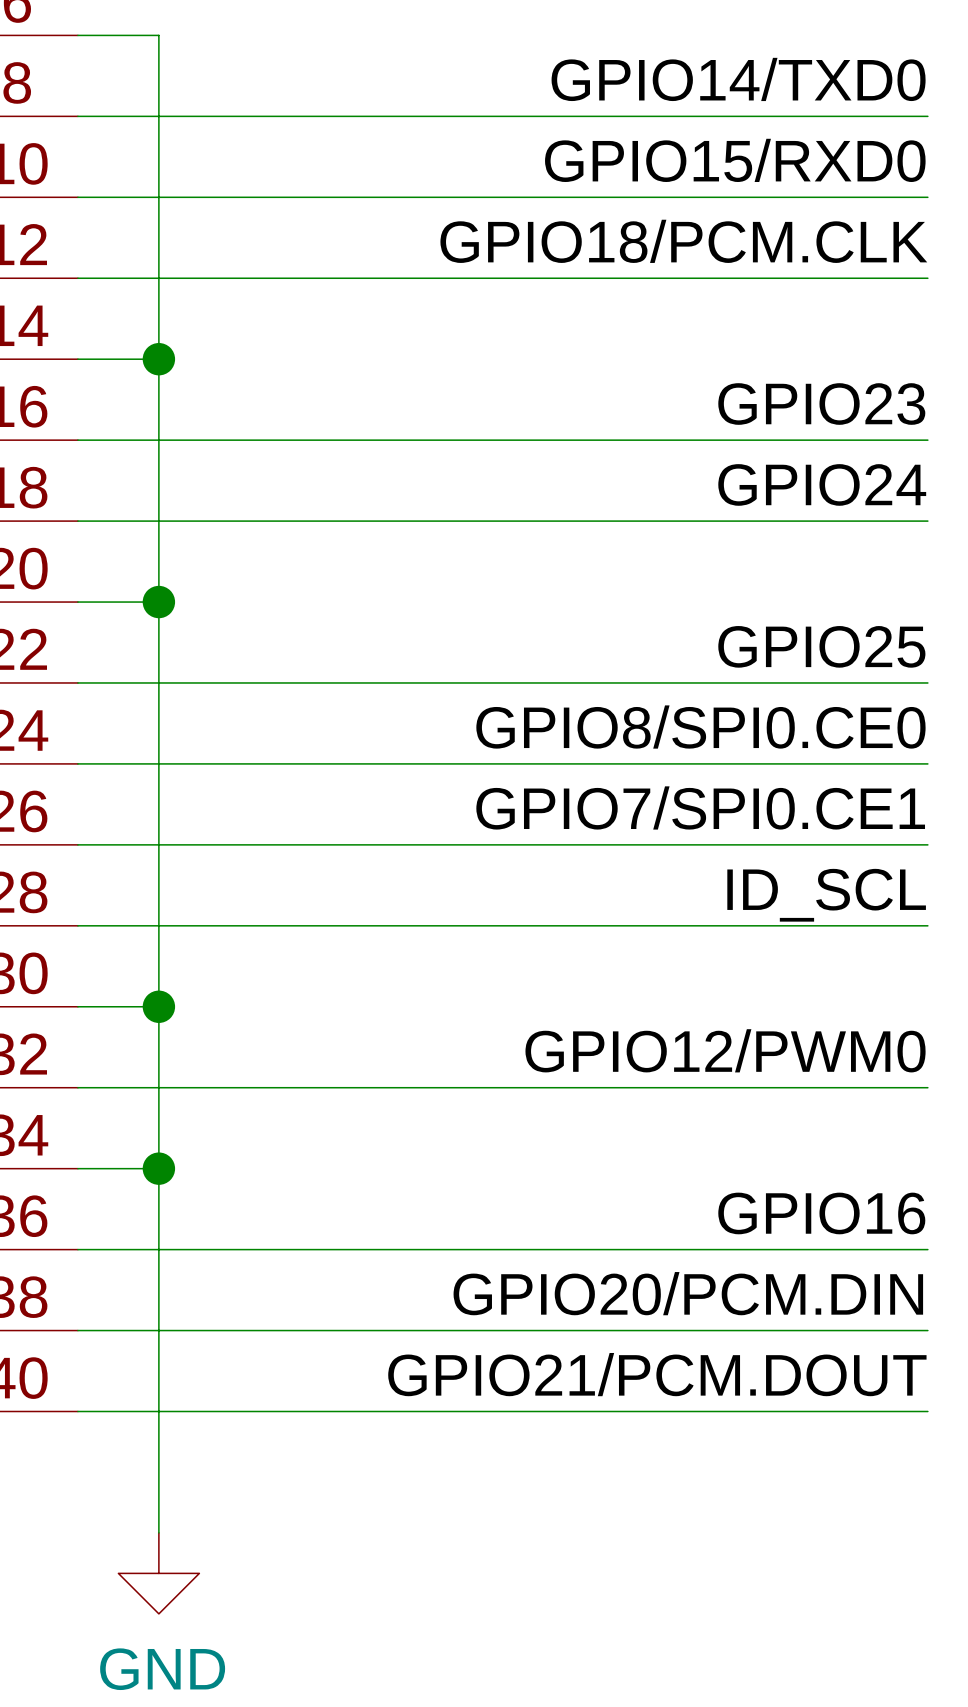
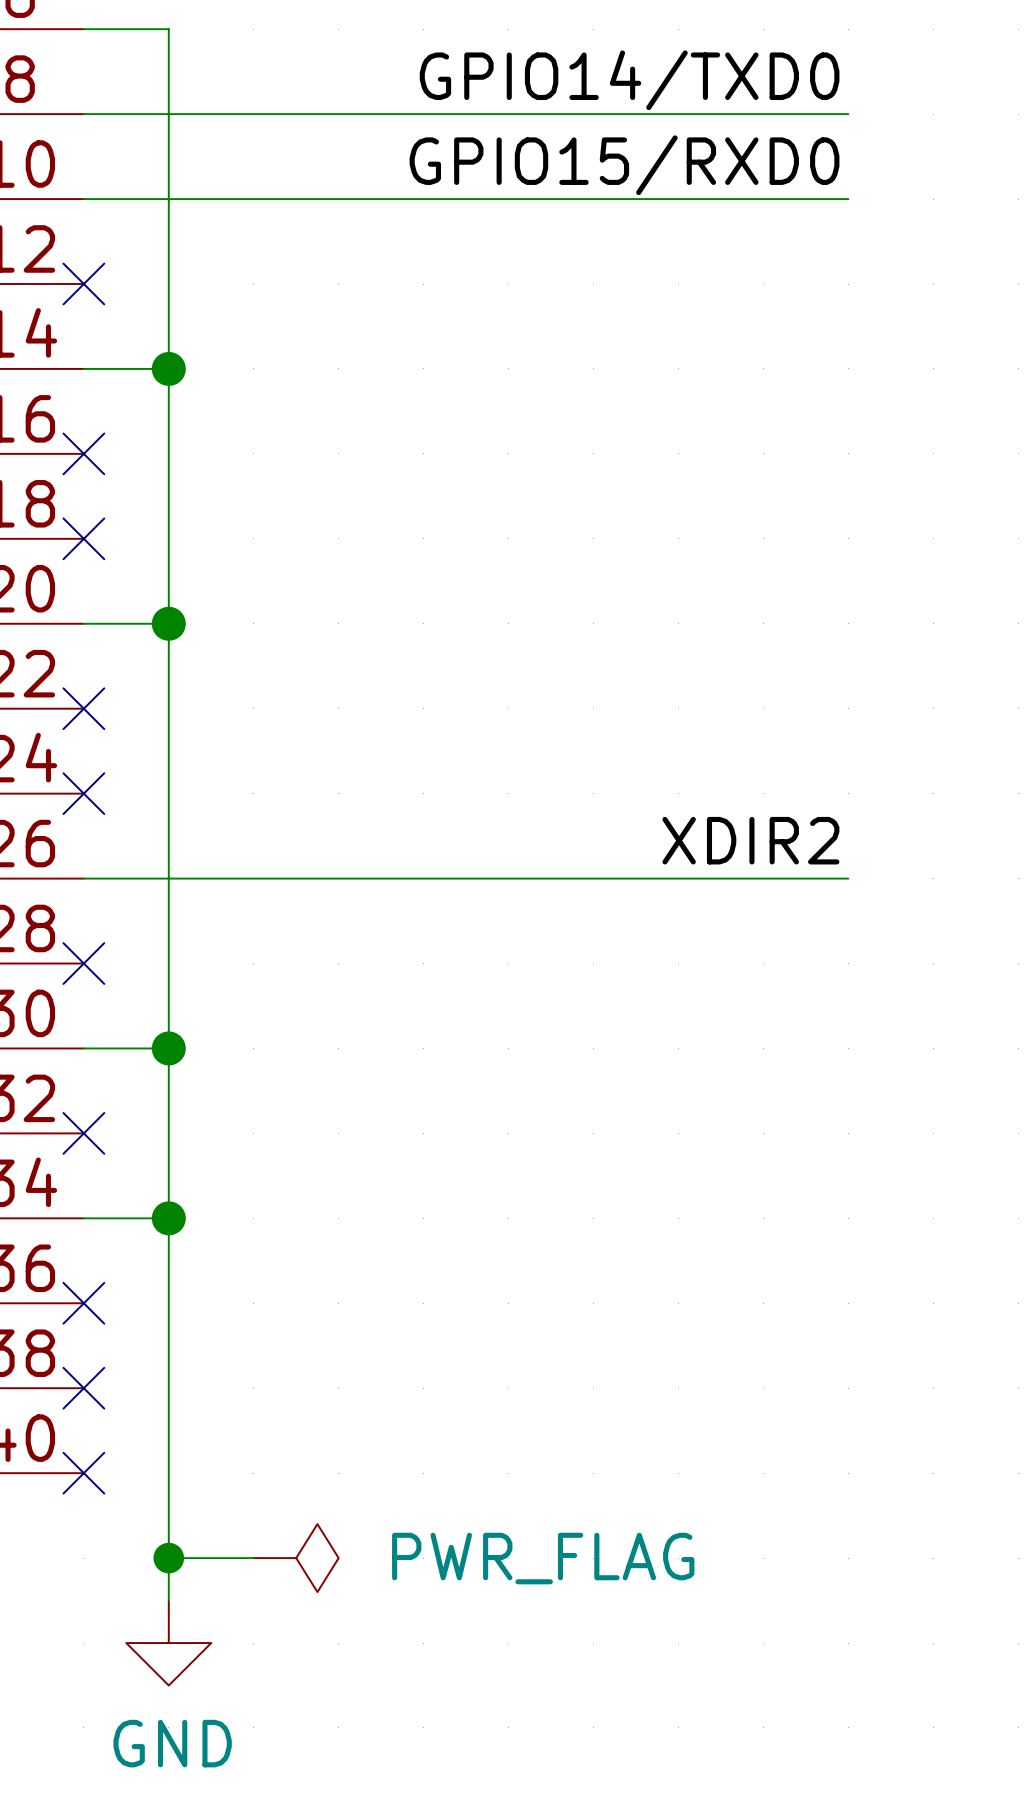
label position: GPIO14/TXD0 (738, 79) -> GPIO14/TXD0 (629, 80)
wire: (806, 116) (927, 116) -> none
label position: GPIO15/RXD0 (735, 160) -> GPIO15/RXD0 (624, 165)
wire: (806, 197) (927, 197) -> none
label: GPIO18/PCM.CLK (683, 241) -> none
wire: (77, 278) (927, 278) -> none
no-connect mark: none -> (83, 284)
label: GPIO23 (821, 404) -> none
wire: (77, 440) (927, 440) -> none
no-connect mark: none -> (83, 453)
label: GPIO24 (822, 484) -> none
wire: (77, 521) (927, 521) -> none
no-connect mark: none -> (83, 538)
label: GPIO25 (821, 646) -> none
wire: (77, 682) (927, 682) -> none
no-connect mark: none -> (83, 708)
label: GPIO8/SPI0.CE0 (700, 727) -> none
wire: (77, 763) (927, 763) -> none
no-connect mark: none -> (83, 793)
label: GPIO7/SPI0.CE1 (700, 807) -> none
label: none -> XDIR2 (750, 840)
wire: (806, 844) (927, 844) -> none
label: ID_SCL (826, 895) -> none
wire: (77, 925) (927, 925) -> none
no-connect mark: none -> (83, 963)
label: GPIO12/PWM0 (725, 1050) -> none
wire: (77, 1087) (927, 1087) -> none
no-connect mark: none -> (83, 1133)
label: GPIO16 (821, 1213) -> none
wire: (77, 1249) (927, 1249) -> none
no-connect mark: none -> (83, 1303)
label: GPIO20/PCM.DIN (688, 1293) -> none
wire: (77, 1330) (927, 1330) -> none
no-connect mark: none -> (83, 1388)
label: GPIO21/PCM.DOUT (657, 1374) -> none
wire: (77, 1411) (927, 1411) -> none
no-connect mark: none -> (83, 1473)
wire: none -> (168, 1558) (253, 1558)
junction: none -> (168, 1558)
power symbol: none -> PWR_FLAG (296, 1558)

